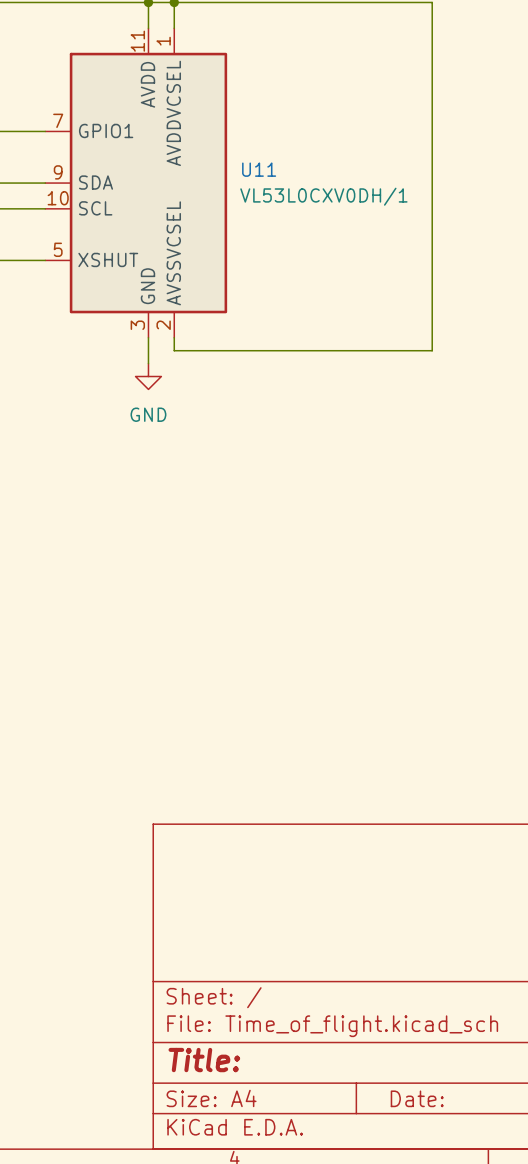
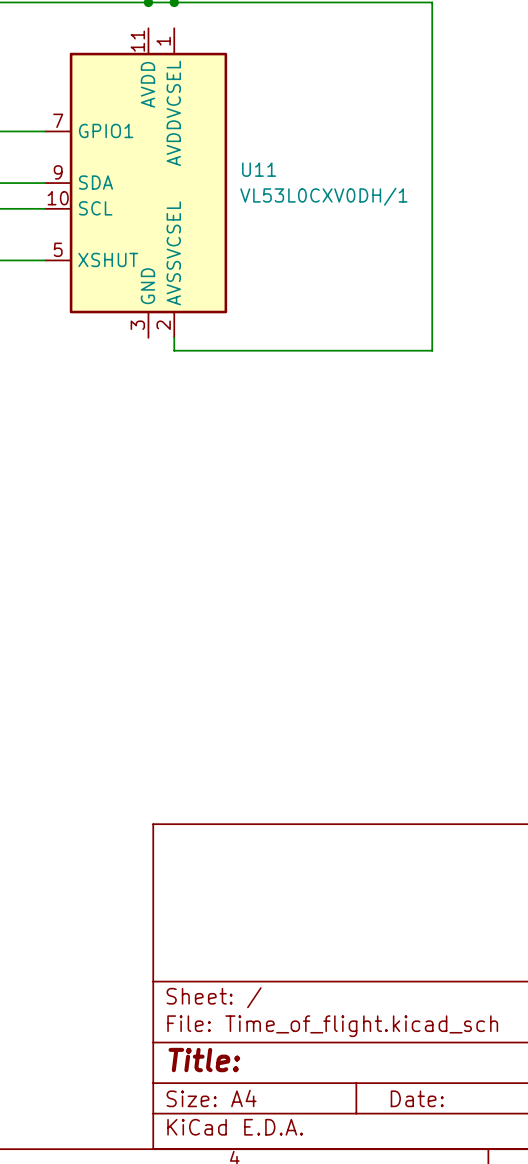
wire: (148, 2) (148, 28) -> none
wire: (174, 2) (174, 28) -> none
wire: (148, 337) (148, 363) -> none
power symbol: GND (148, 376) -> none

